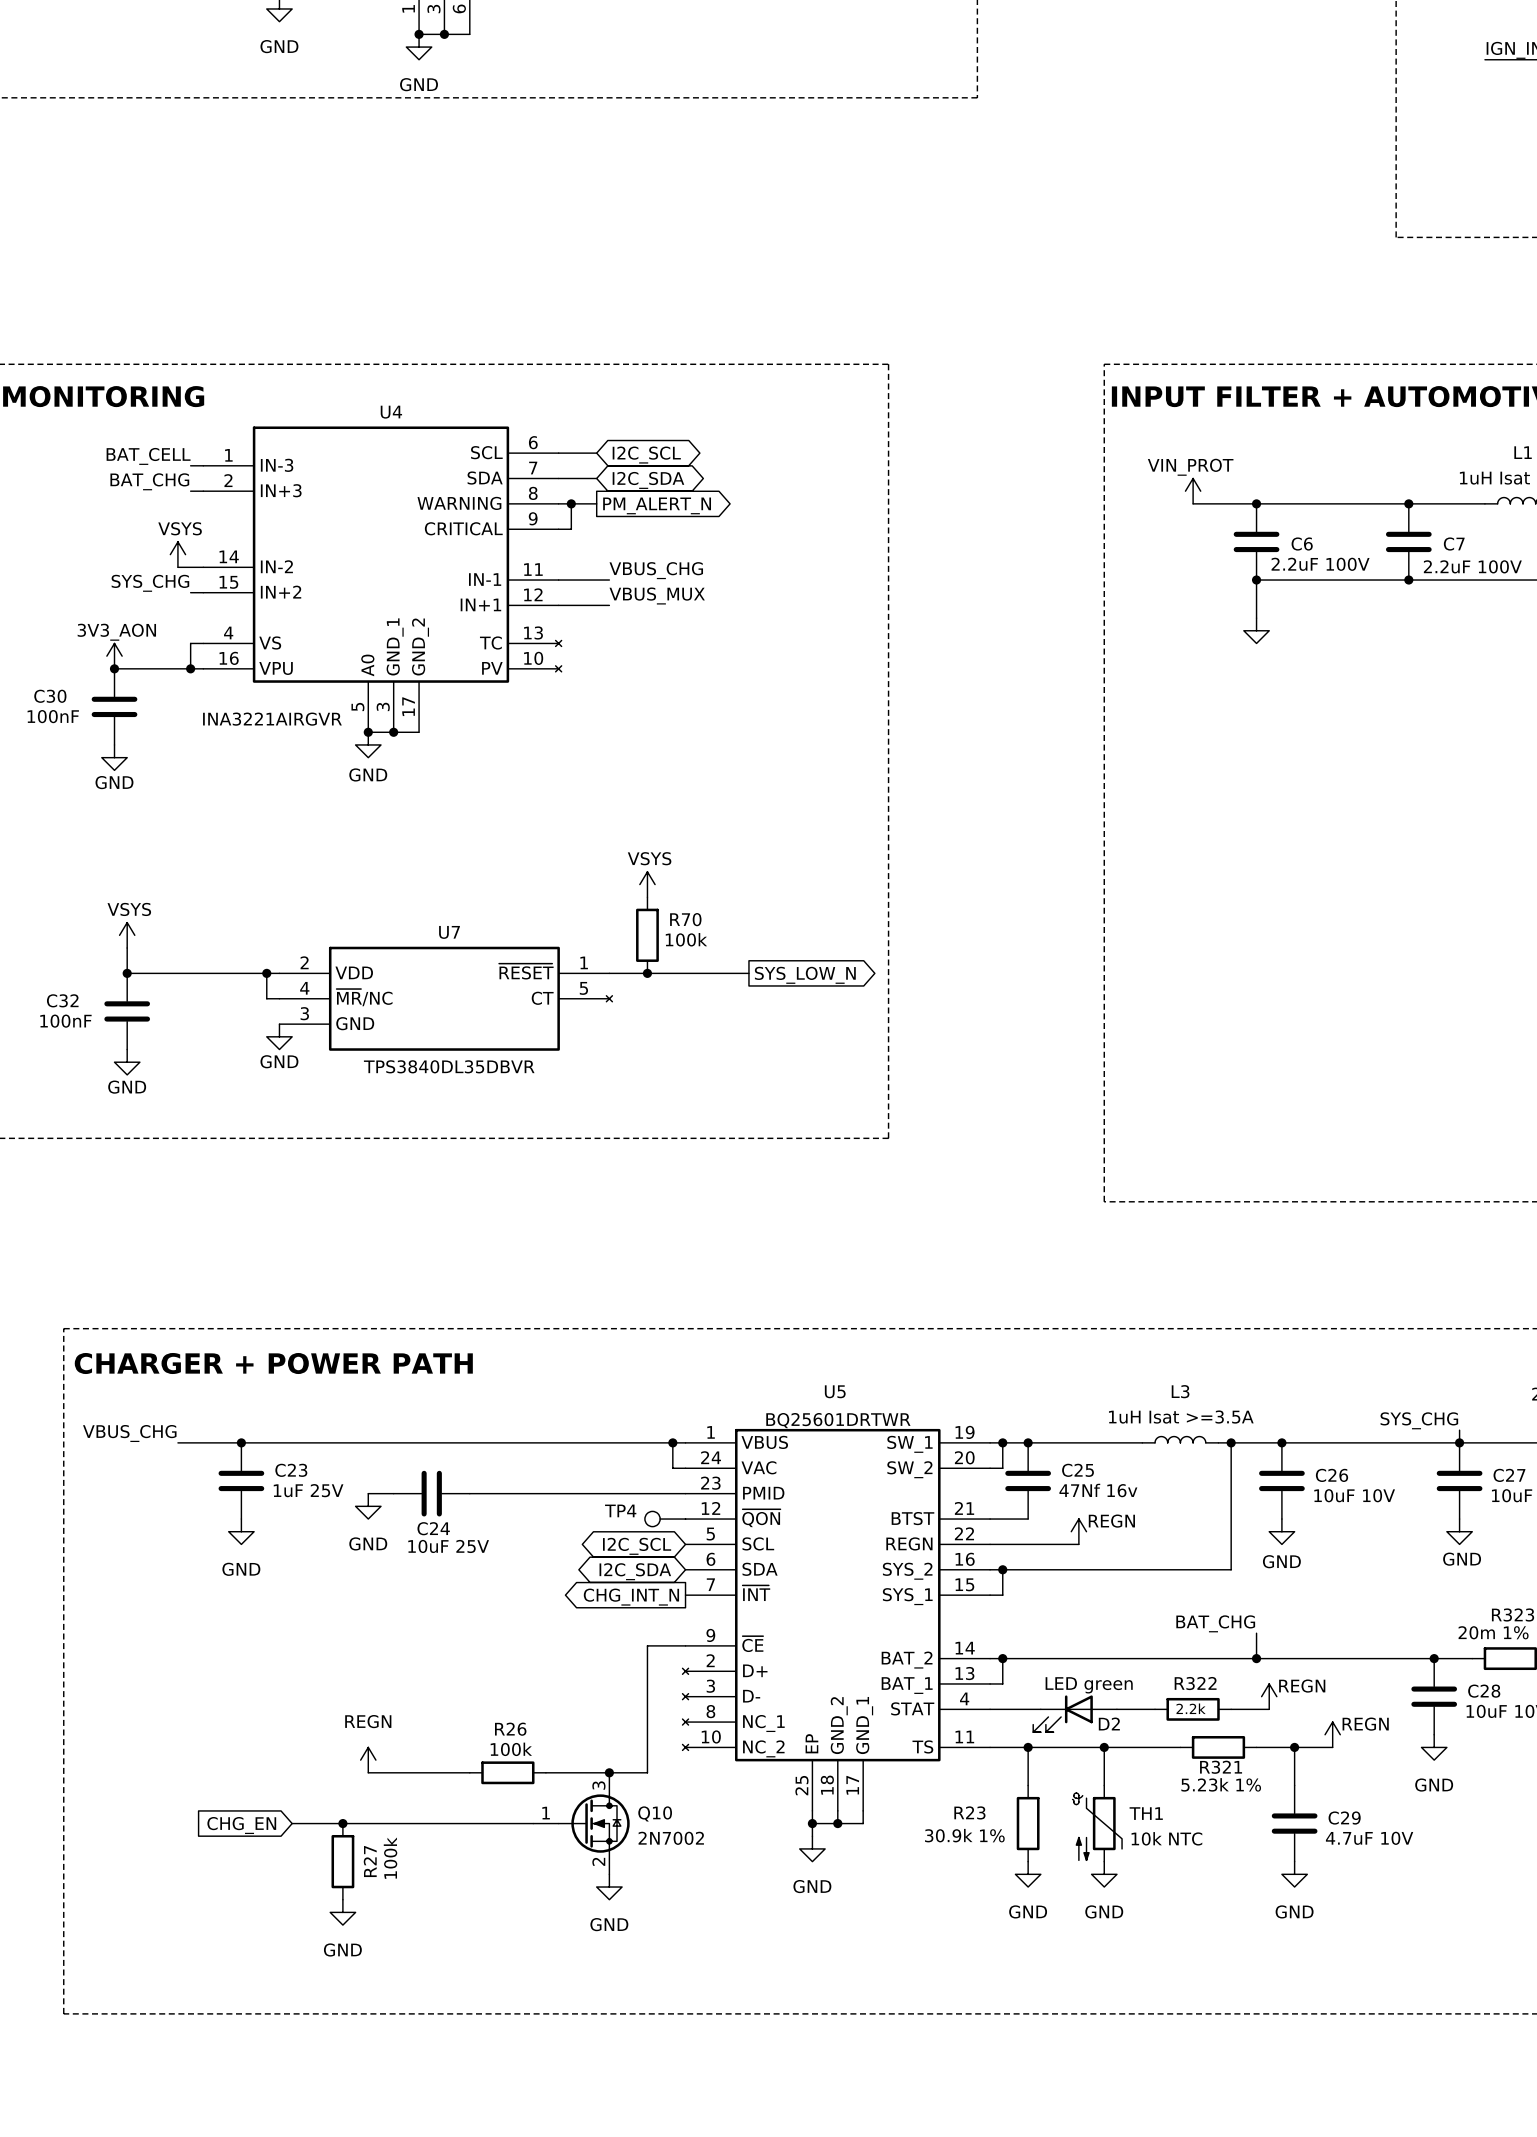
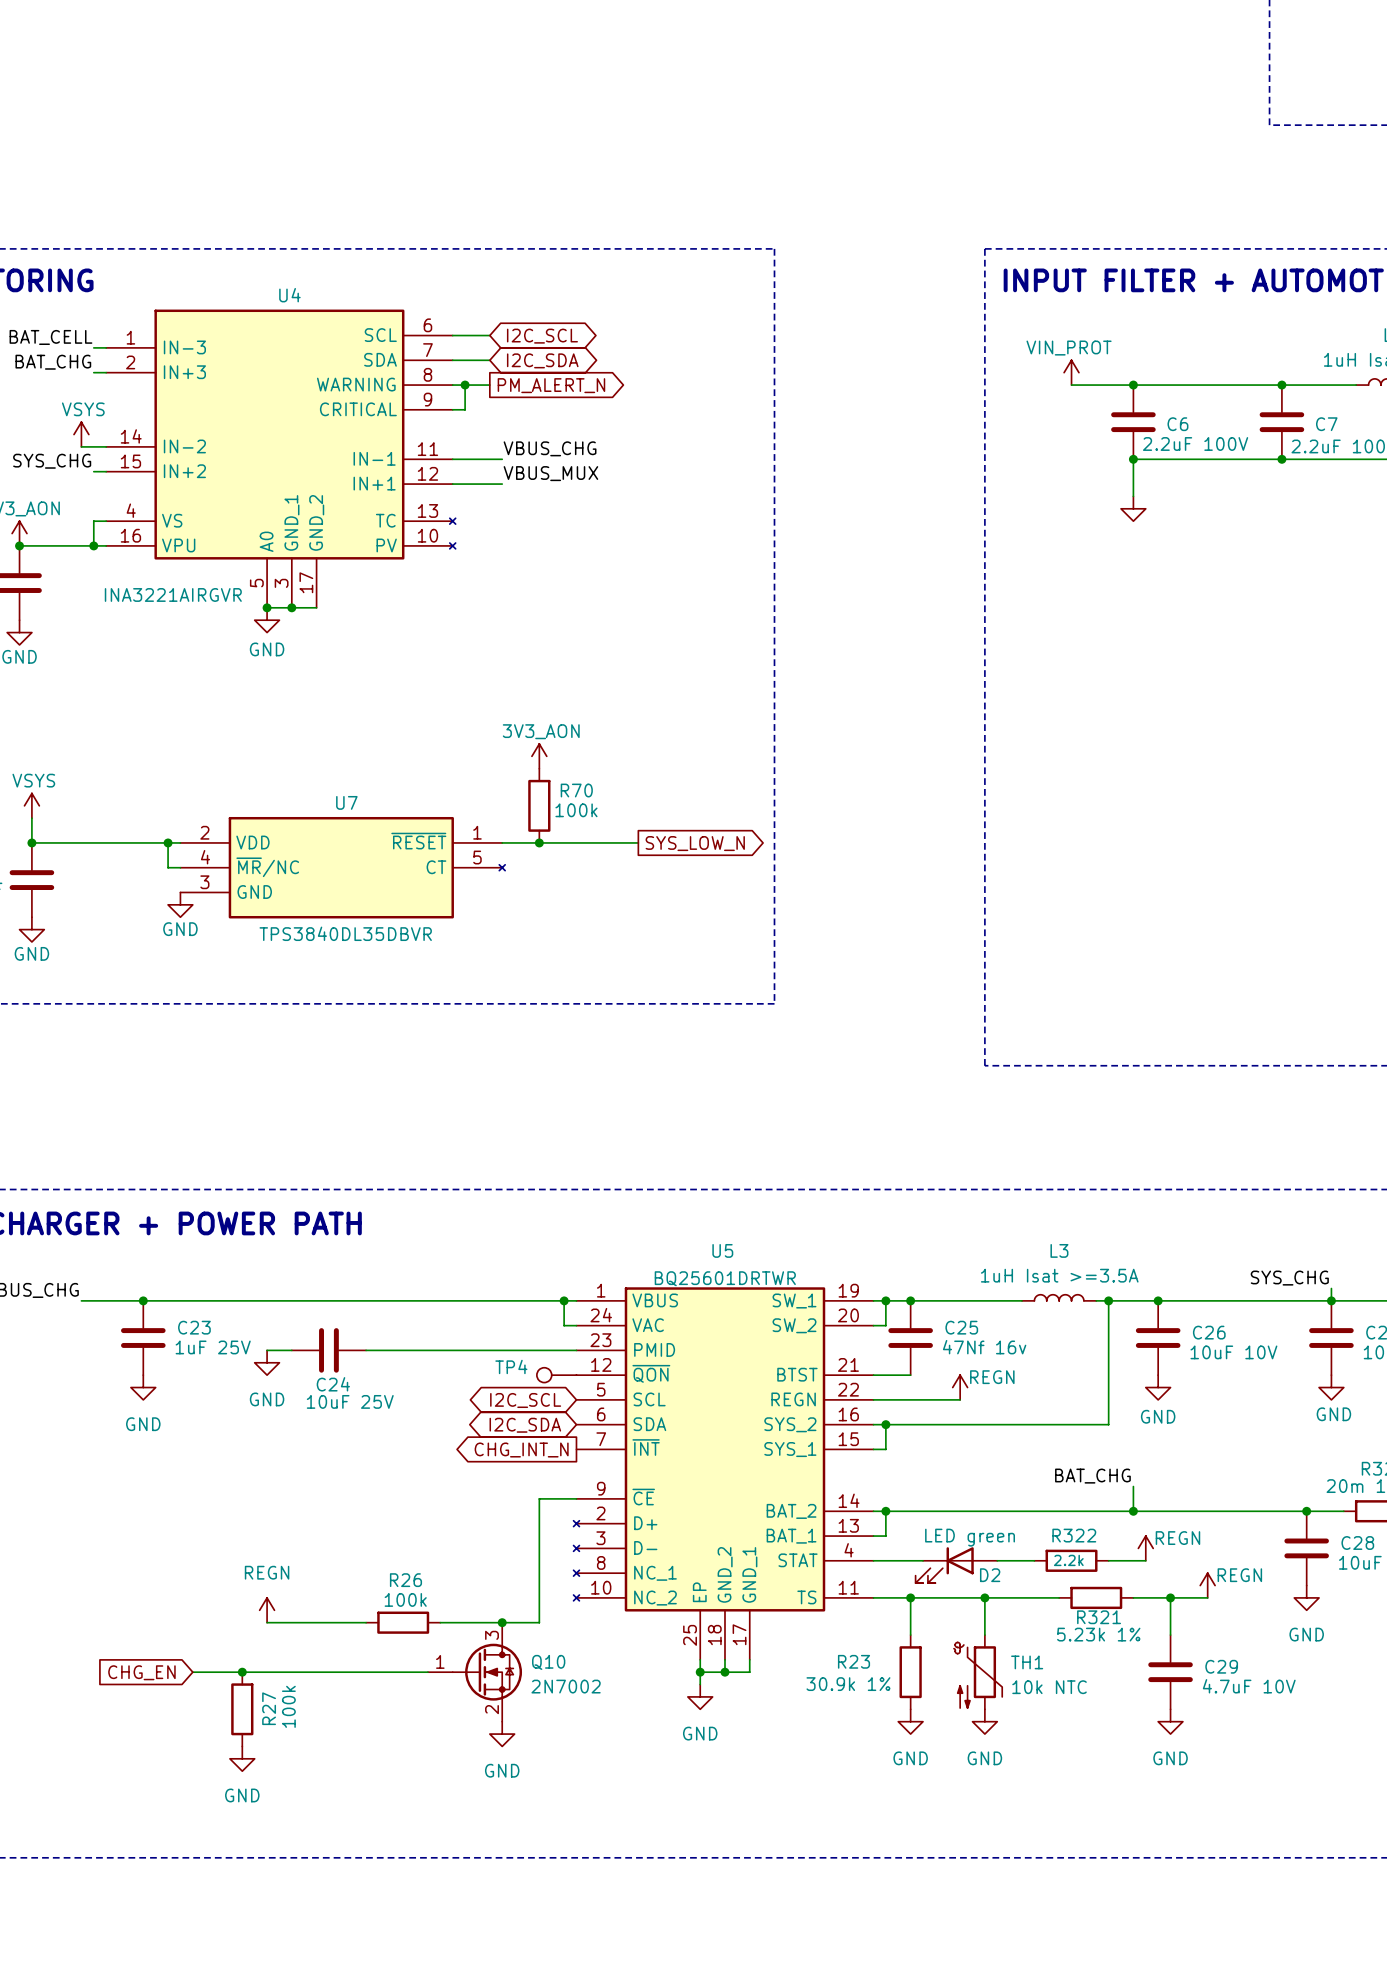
power symbol: VSYS (647, 884) -> 3V3_AON (539, 756)

